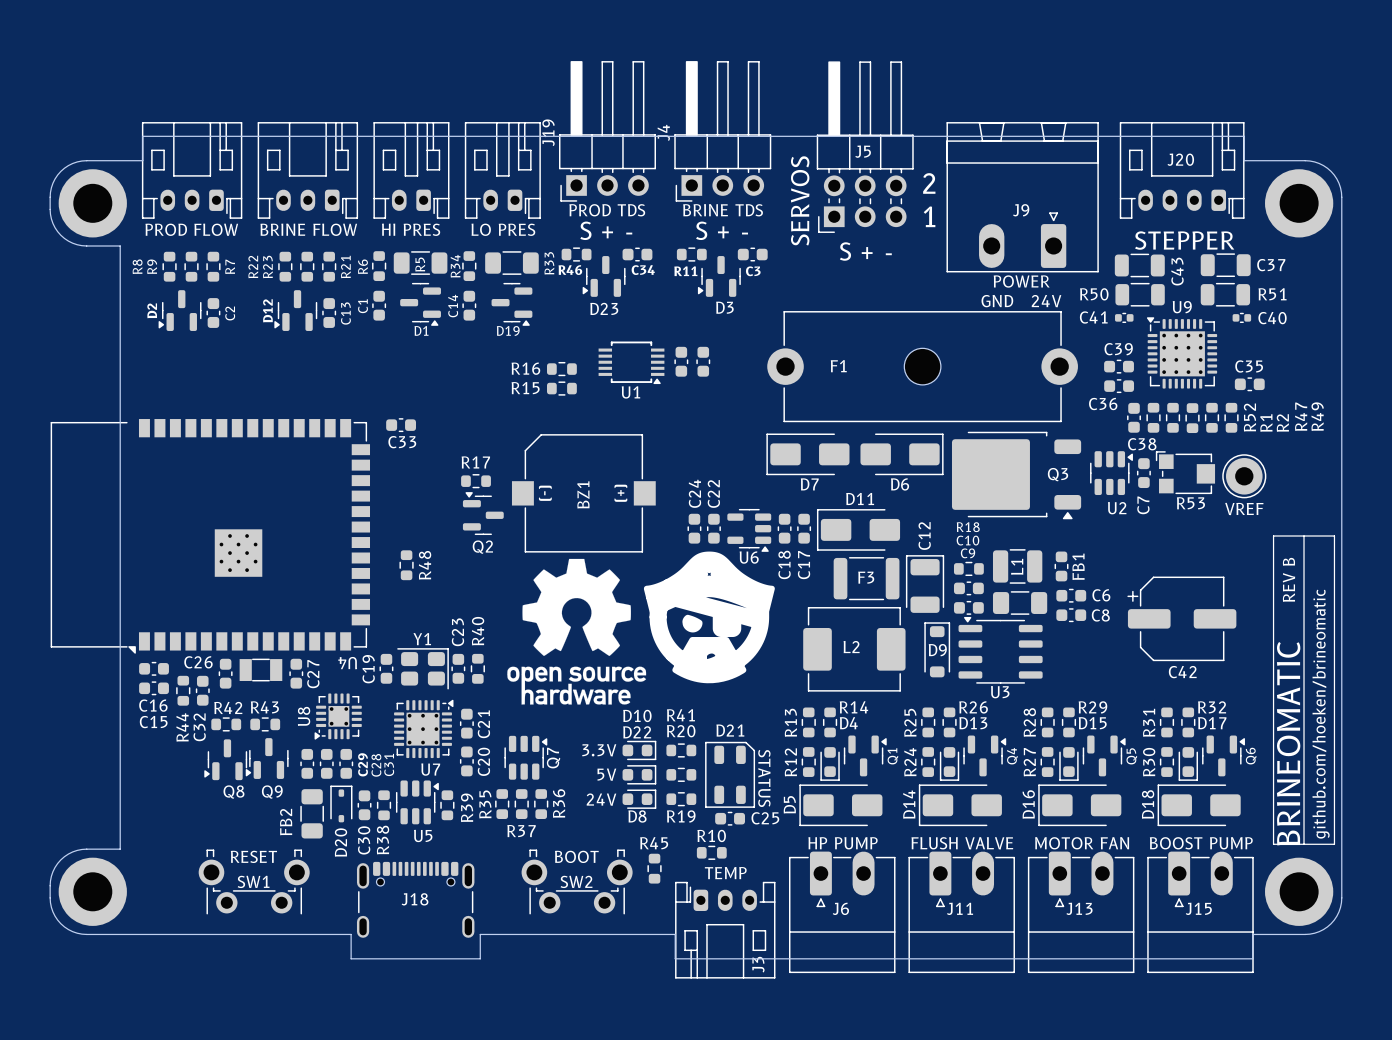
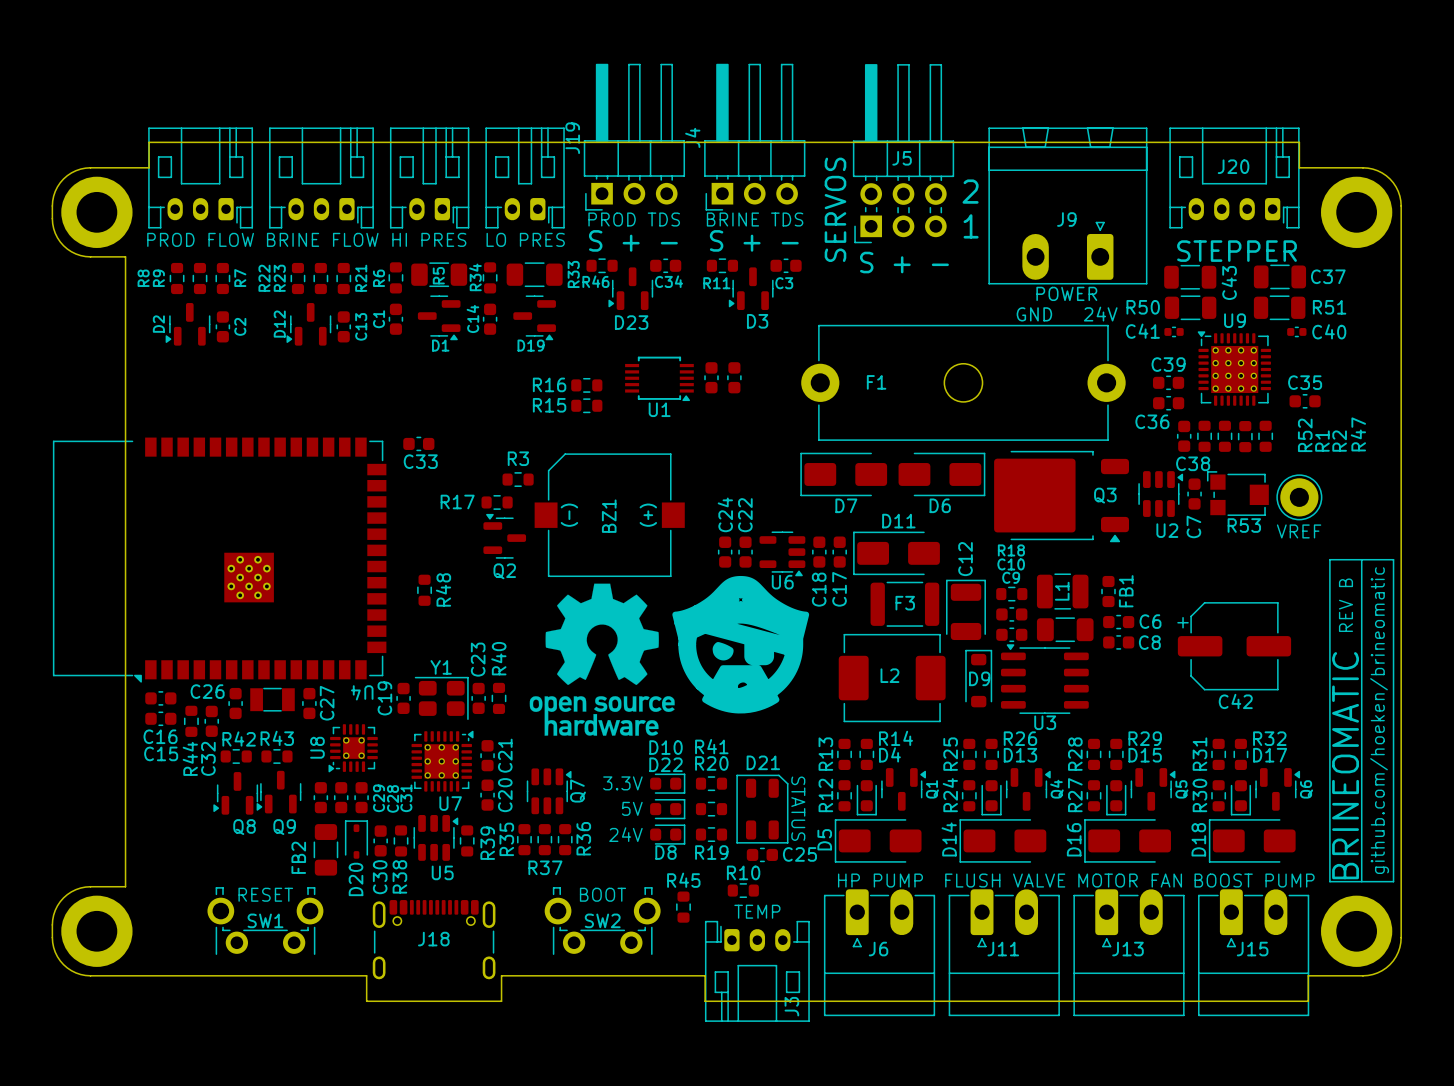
R49: (1231, 417) -> none
R3: none -> (518, 479)
R17 name position: R17 (475, 462) -> R17 (457, 501)

